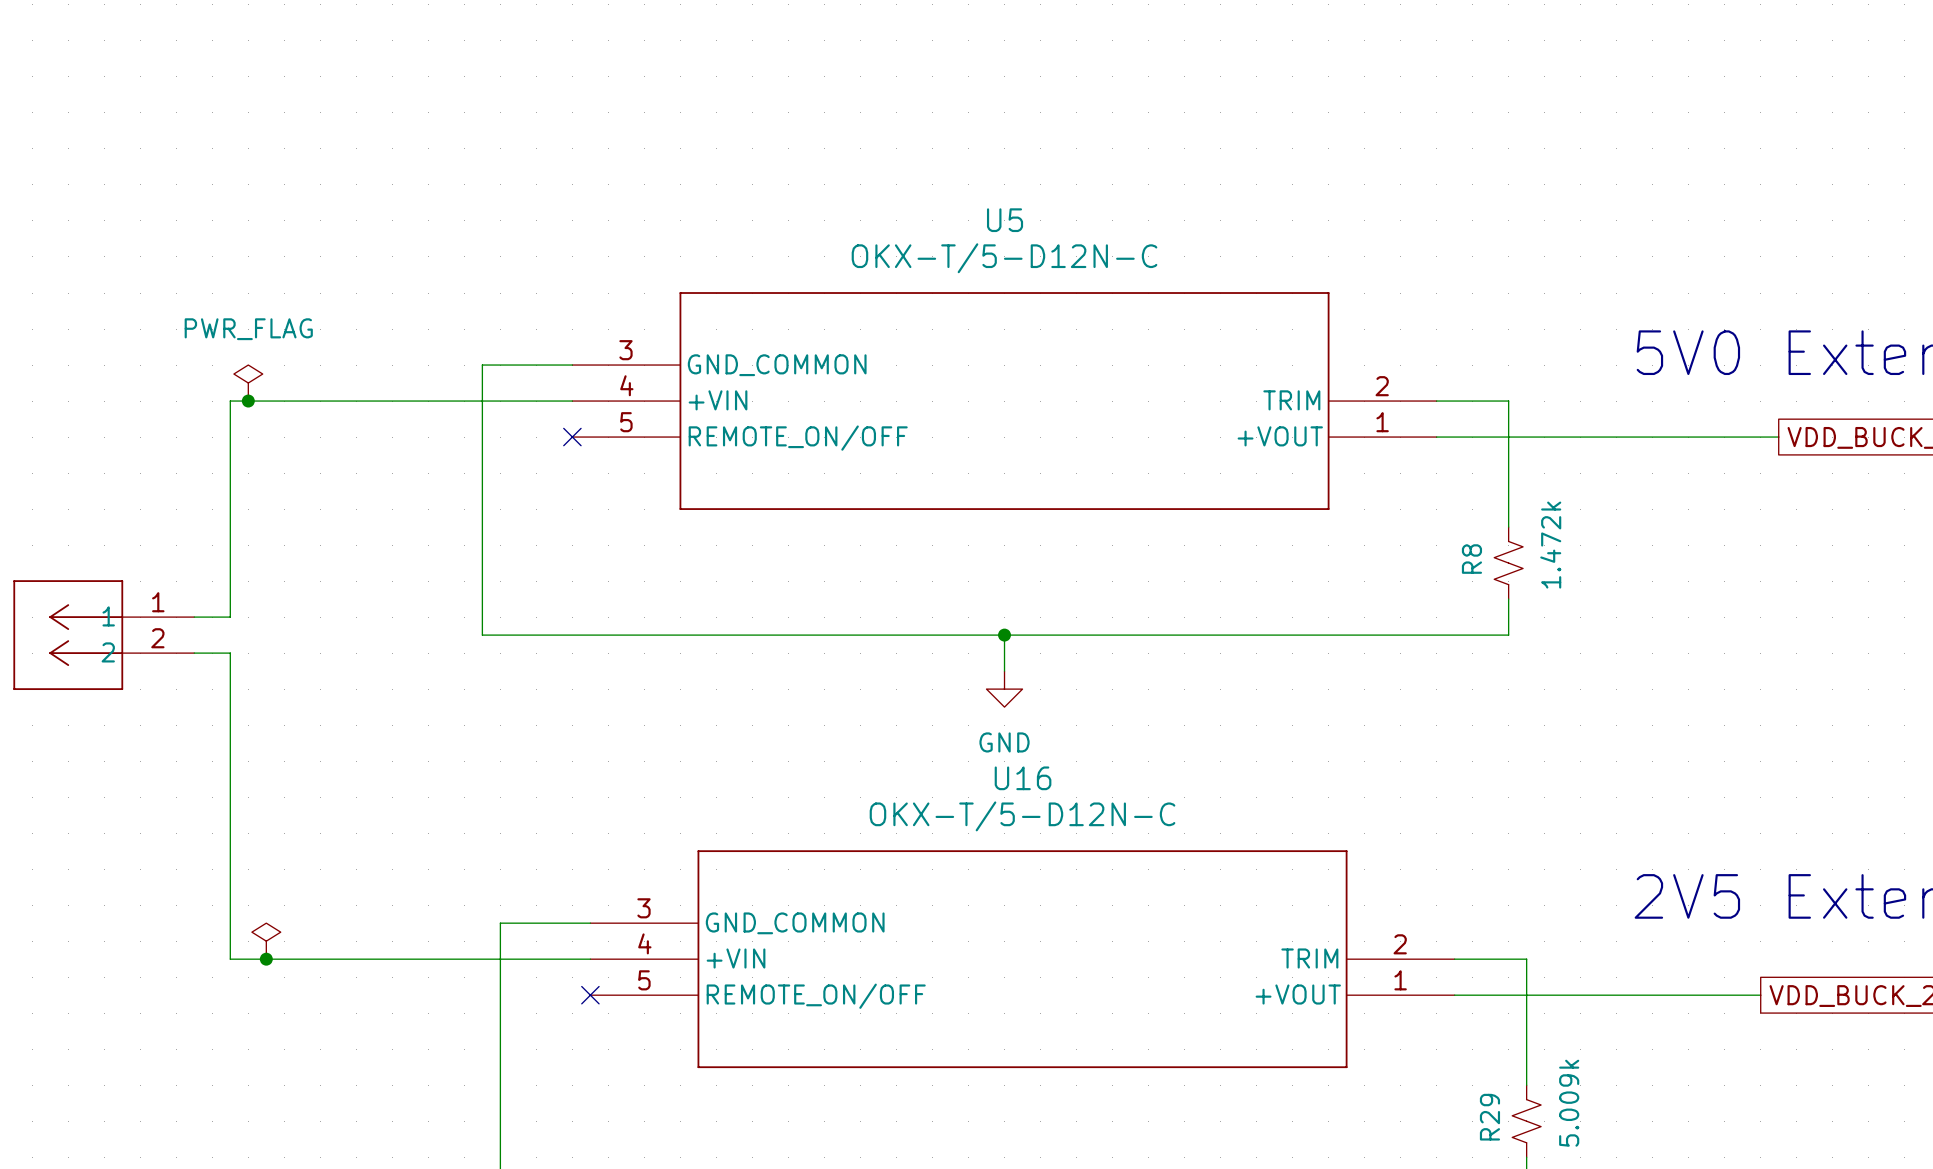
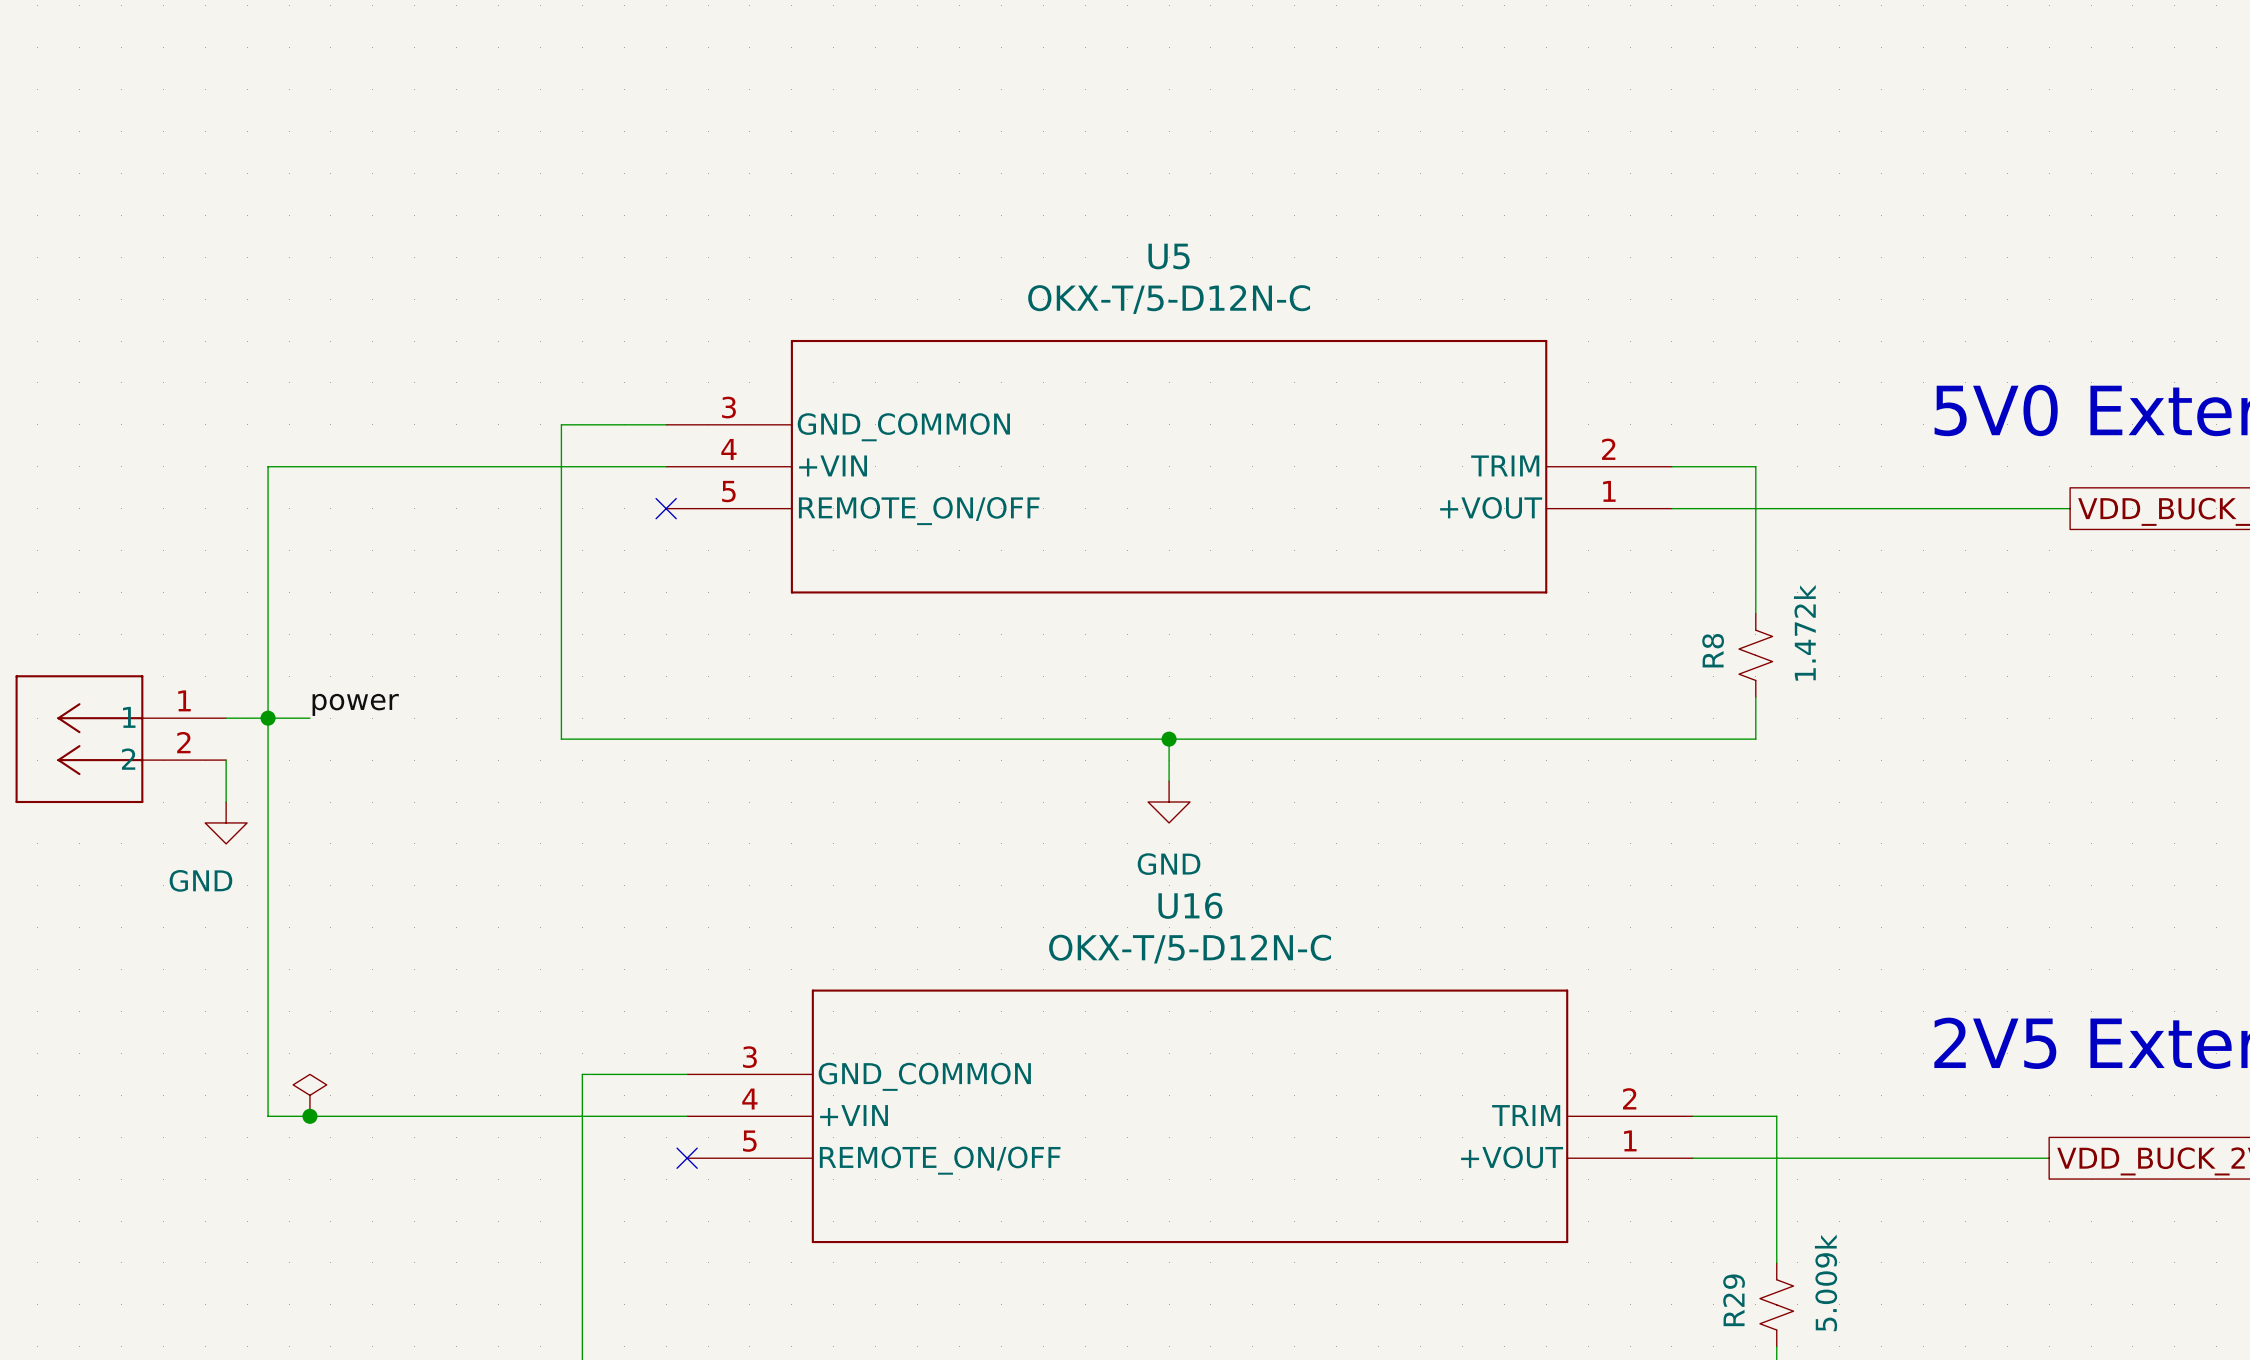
power symbol: PWR_FLAG (248, 383) -> none
junction: (248, 401) -> none
label: none -> power (355, 704)
junction: none -> (268, 718)
wire: none -> (309, 718) (268, 718) (268, 760)
wire: (194, 653) (230, 653) -> (226, 760) (226, 802)
power symbol: none -> GND (226, 822)

